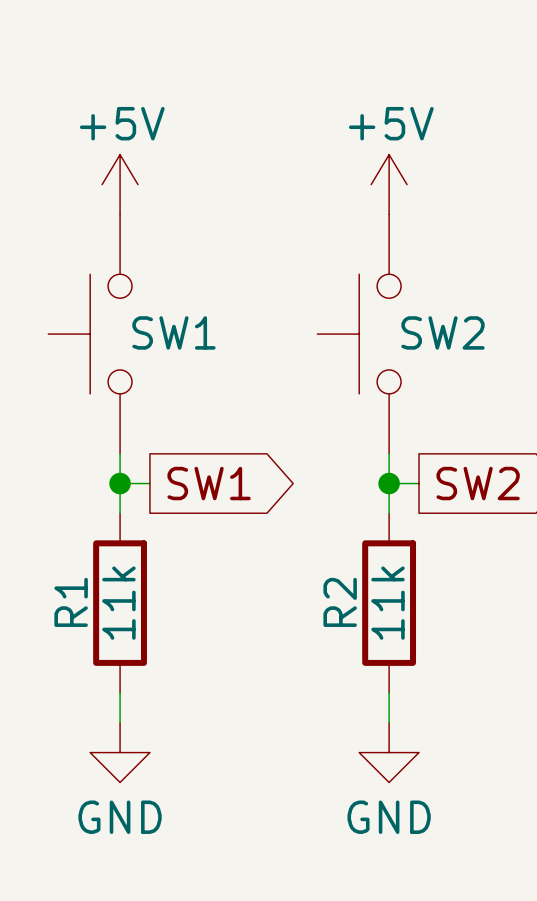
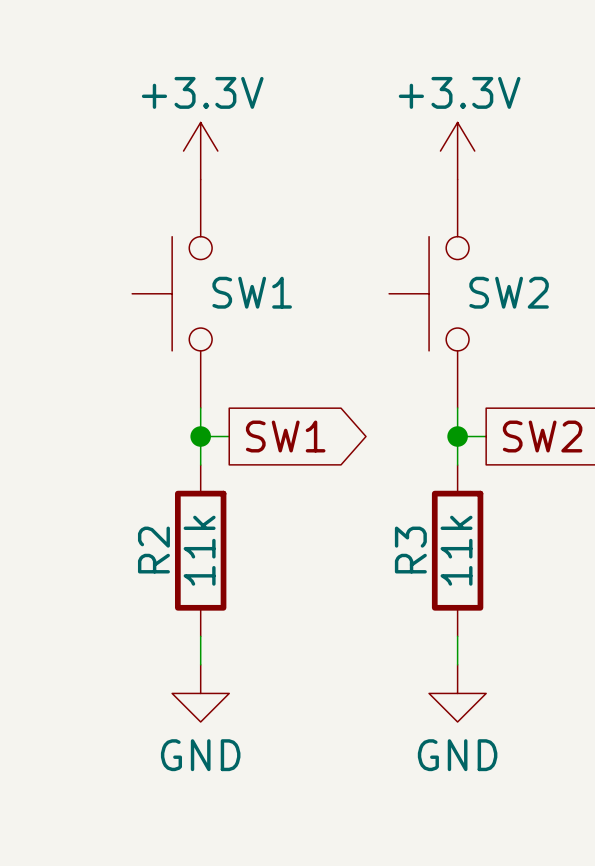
power symbol: +5V (120, 184) -> +3.3V (200, 151)
power symbol: +5V (389, 184) -> +3.3V (457, 151)
R1 name: R1 (71, 602) -> R2 (153, 550)
R2 name: R2 (340, 602) -> R3 (410, 550)

